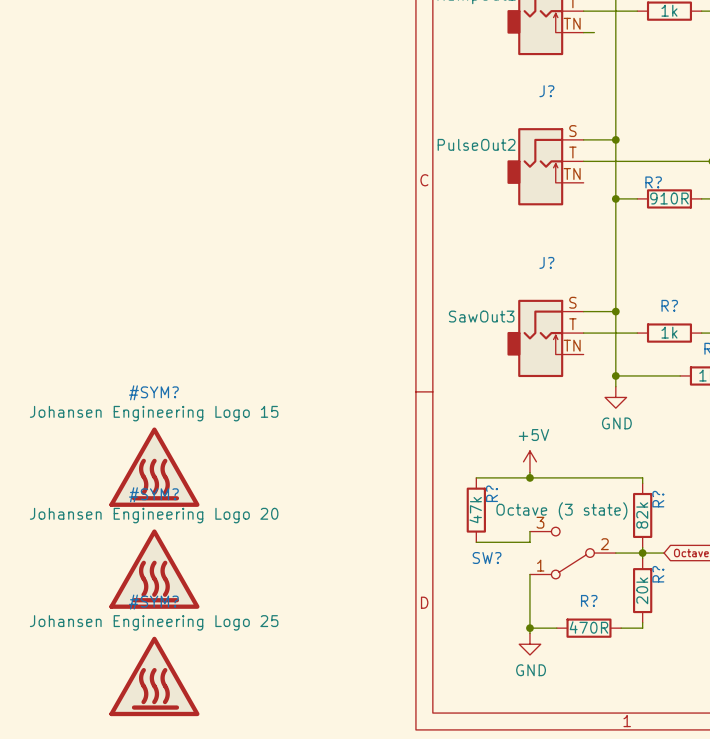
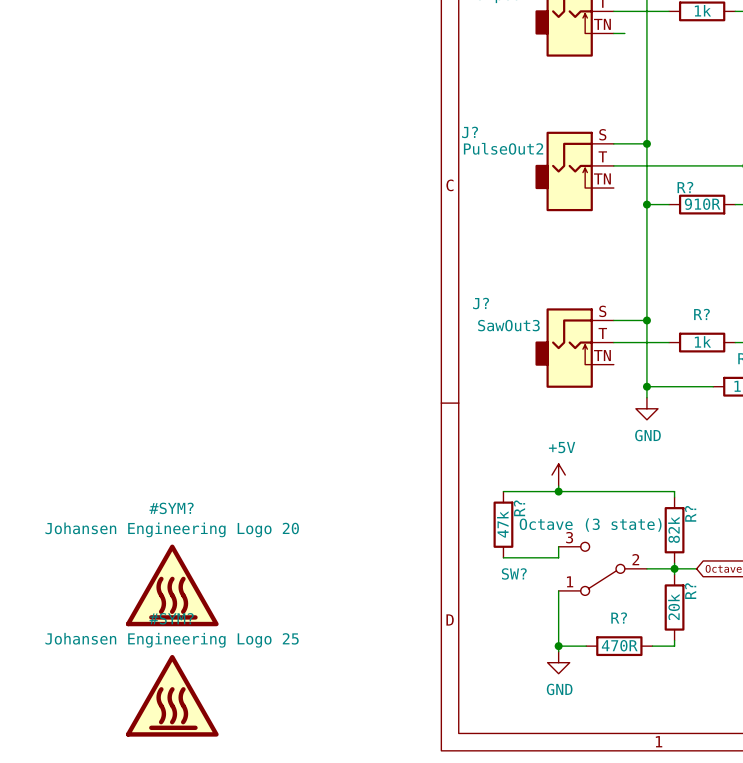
J? name position: J? (546, 91) -> J? (470, 132)
J? name position: J? (546, 262) -> J? (481, 303)
#SYM?: Johansen Engineering Logo 15 (154, 467) -> none

